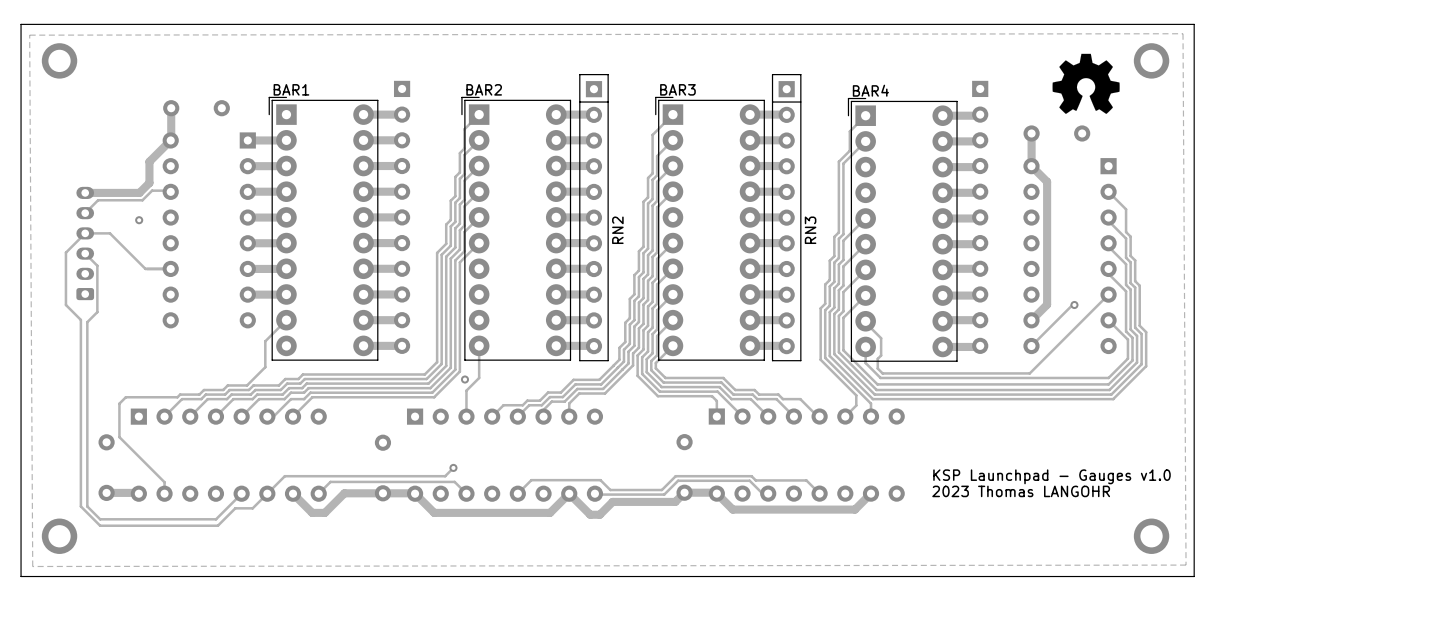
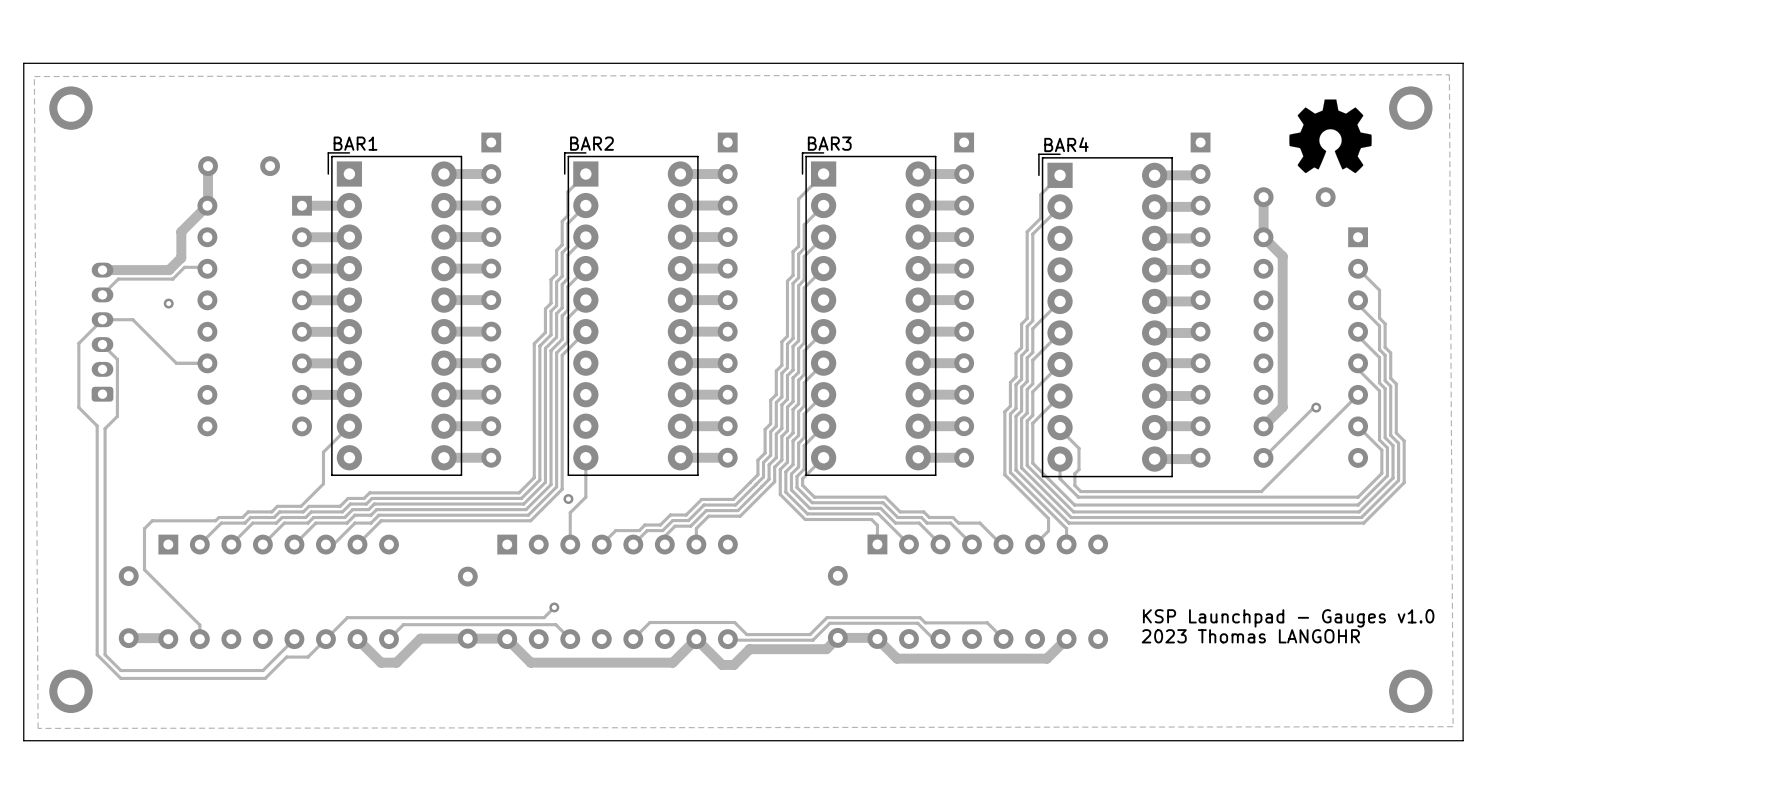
RN2: (593, 217) -> none
part: none -> (727, 300)
RN3: (786, 217) -> none
part: none -> (964, 300)

